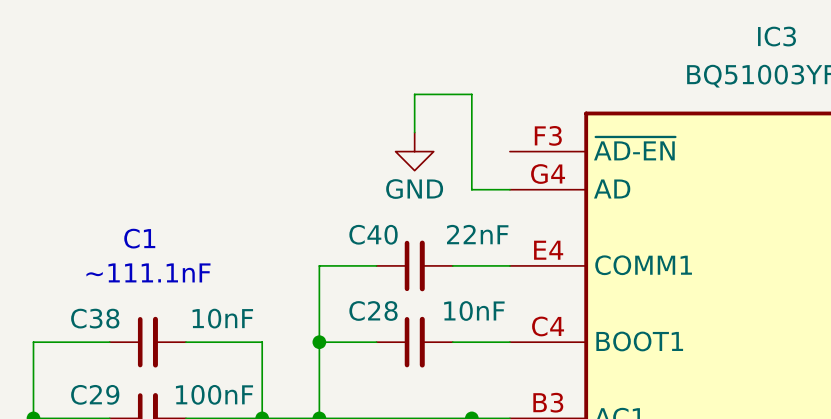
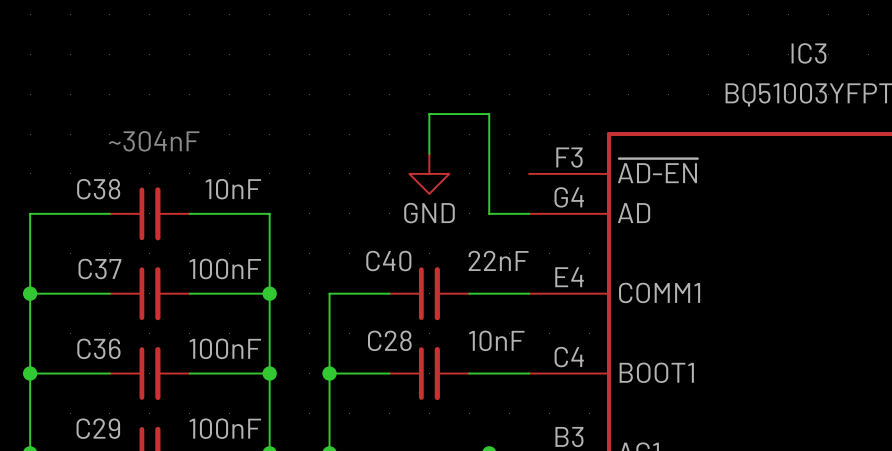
text: none -> ~304nF (154, 141)
wire: none -> (109, 213) (30, 213) (30, 373)
C38: none -> 10nF (149, 213)
wire: none -> (189, 213) (269, 213) (269, 373)
text: C1 (139, 238) -> none
wire: none -> (30, 293) (109, 293)
junction: none -> (30, 293)
C37: none -> 100nF (149, 293)
wire: none -> (189, 293) (269, 293)
junction: none -> (269, 293)
text: ~111.1nF (148, 272) -> none
C38 name: C38 (95, 318) -> C36 (98, 348)
C38 value: 10nF (222, 318) -> 100nF (225, 348)
junction: none -> (30, 373)
junction: none -> (269, 373)

